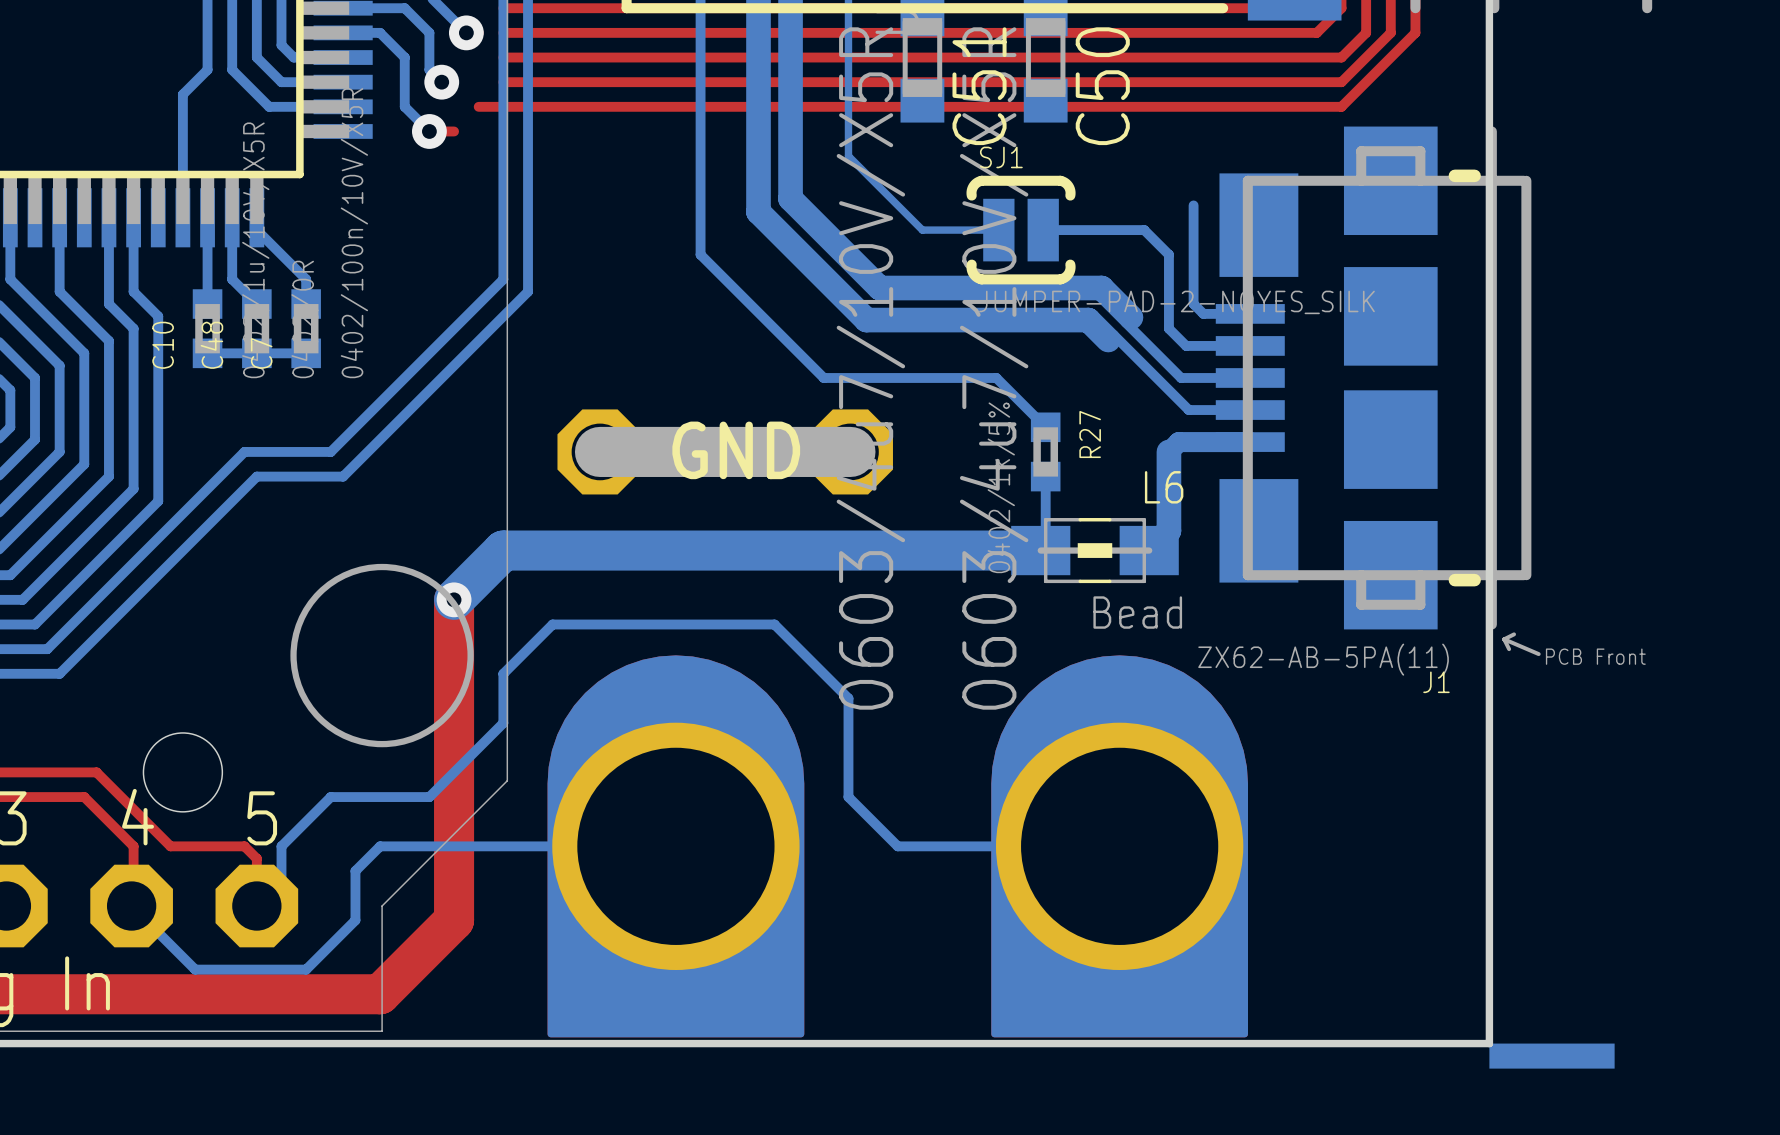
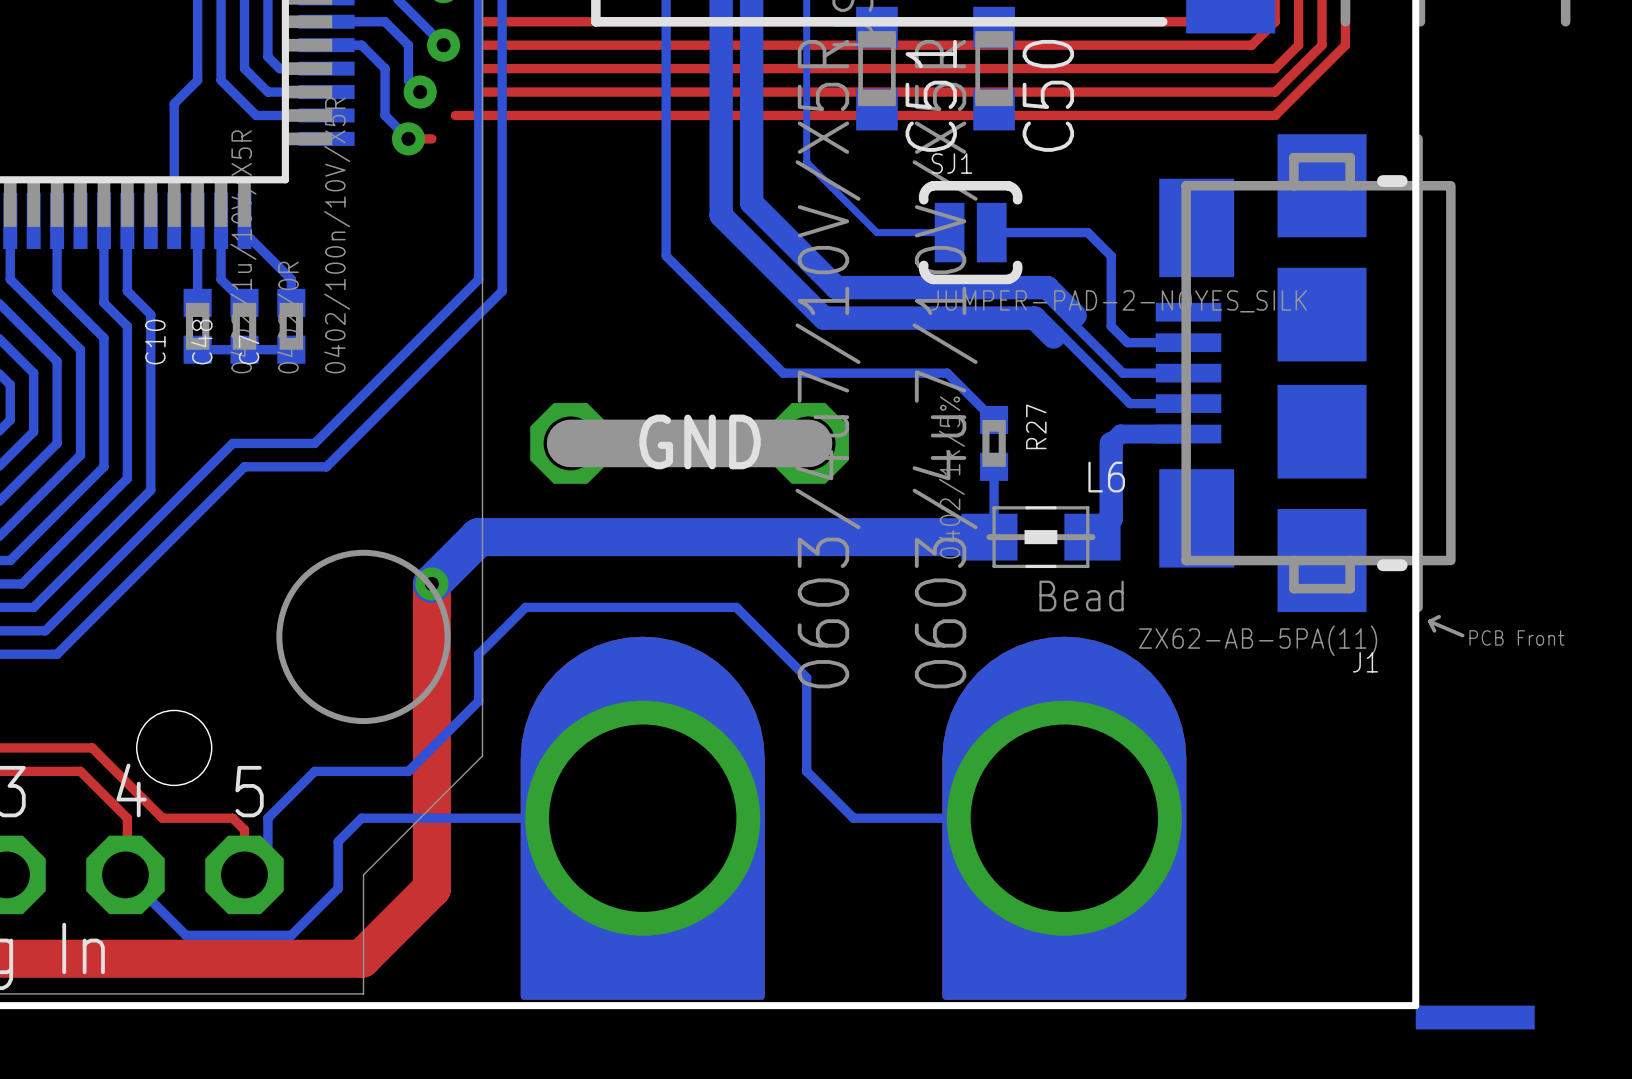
bottom track: (1193, 205) (1193, 304) (1203, 313) (1250, 313) -> none

